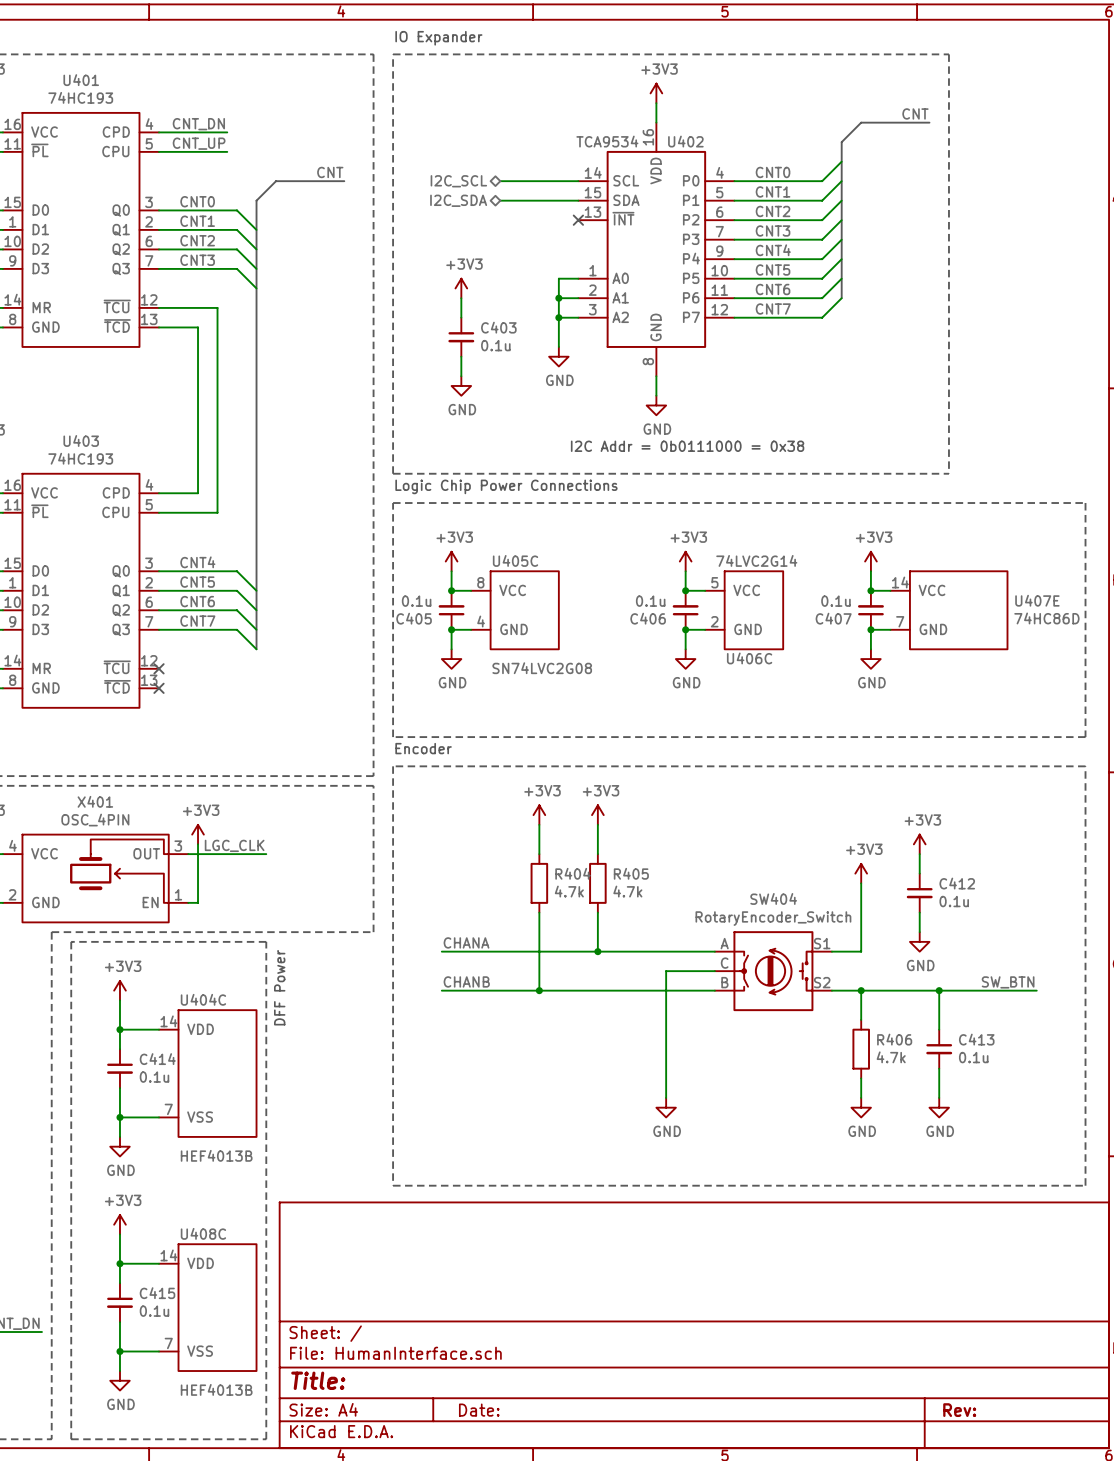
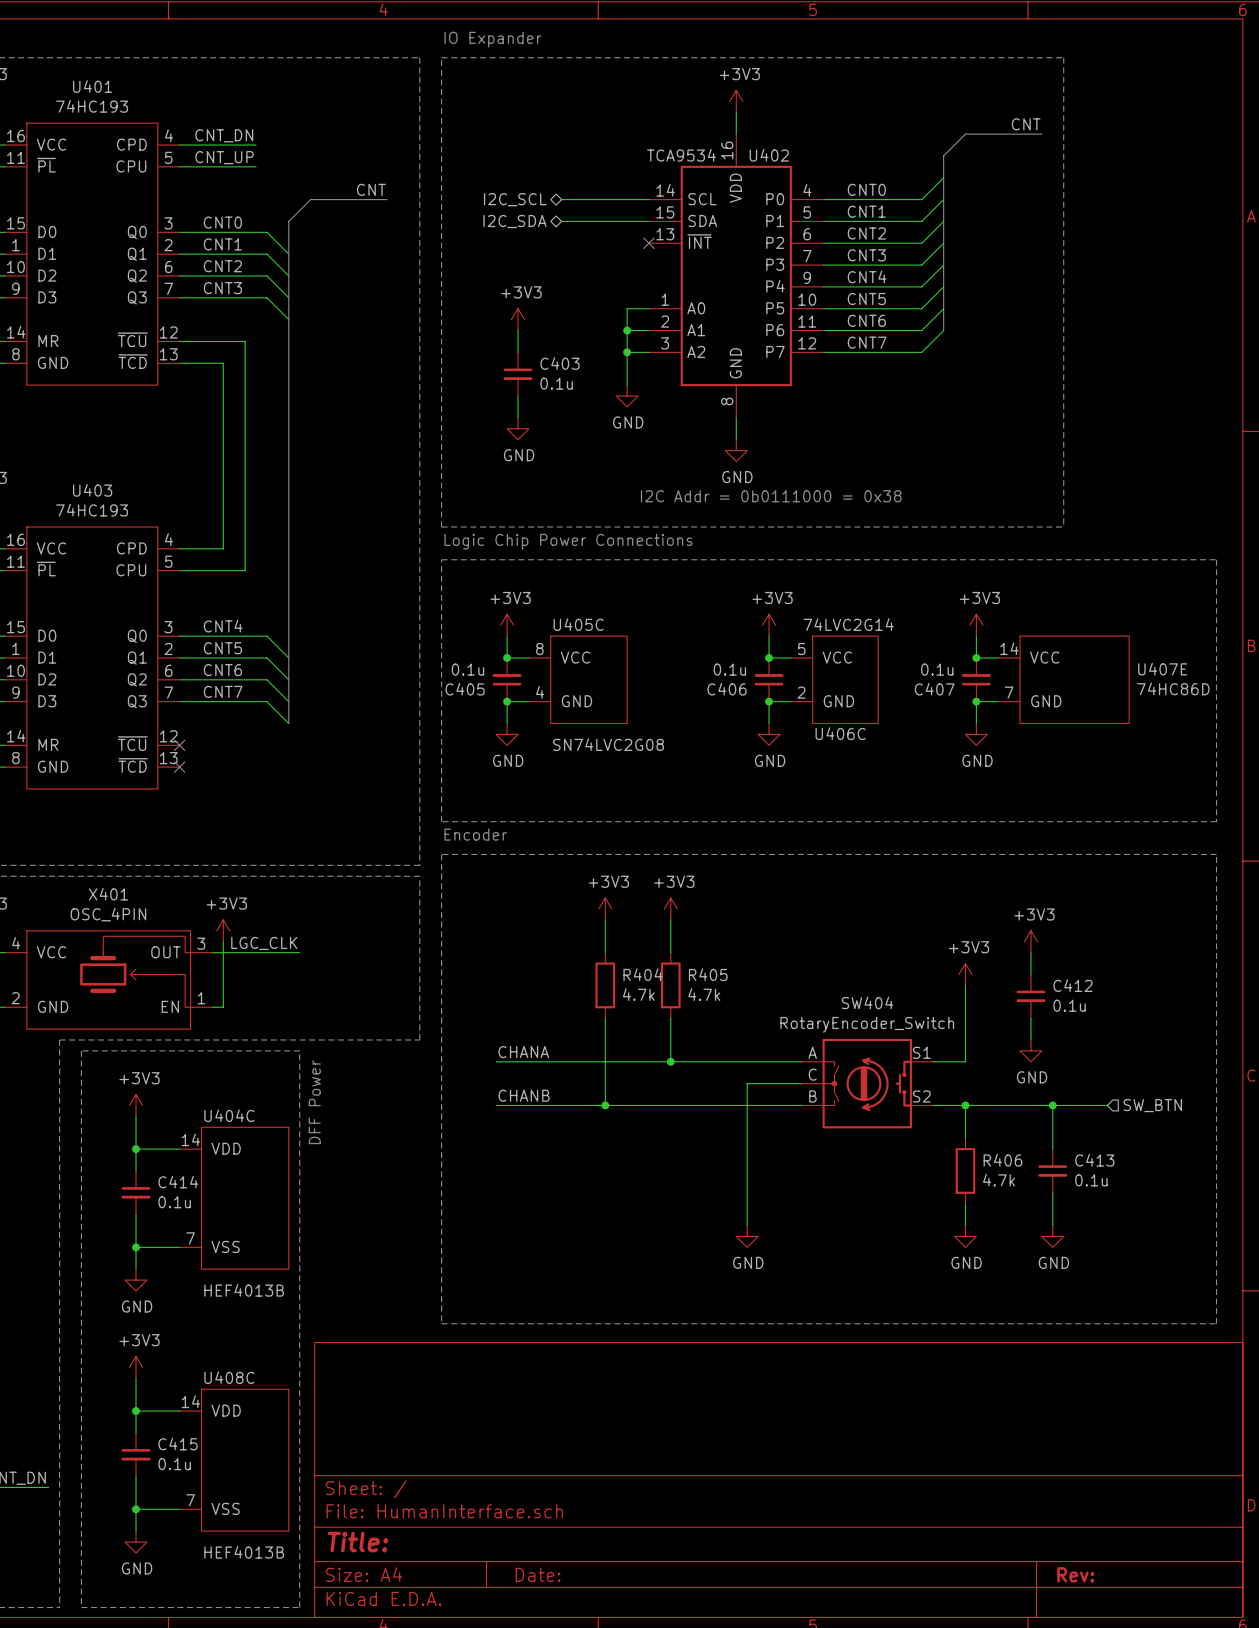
label: SW_BTN (1008, 982) -> none
wire: (987, 990) (1036, 990) -> none
hierarchical label: none -> SW_BTN (1152, 1105)

